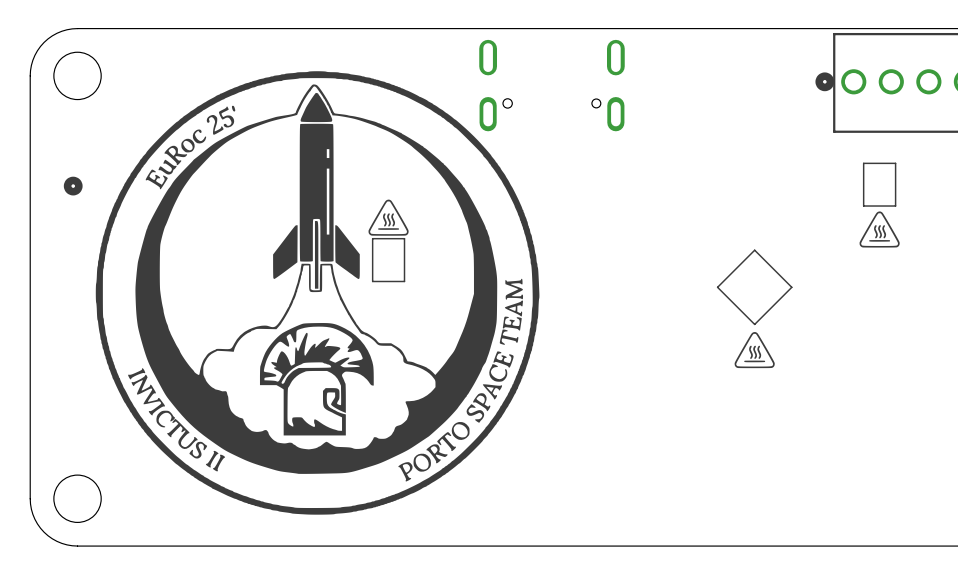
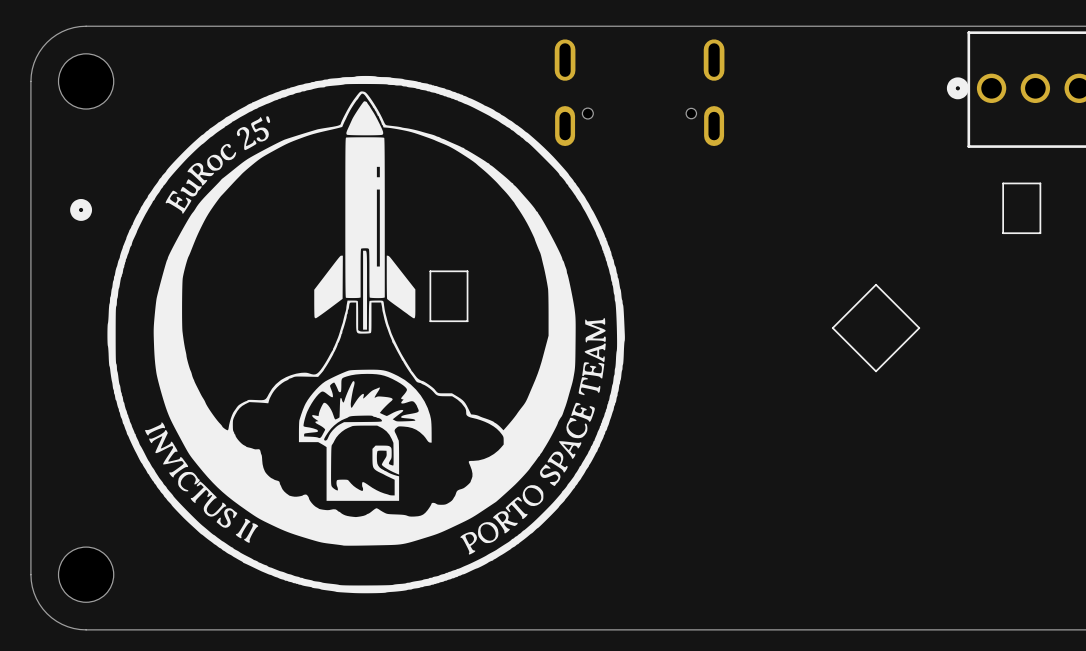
drawing: [368, 199, 409, 236] -> none
drawing: [859, 211, 900, 248] -> none
drawing: [734, 332, 775, 369] -> none

